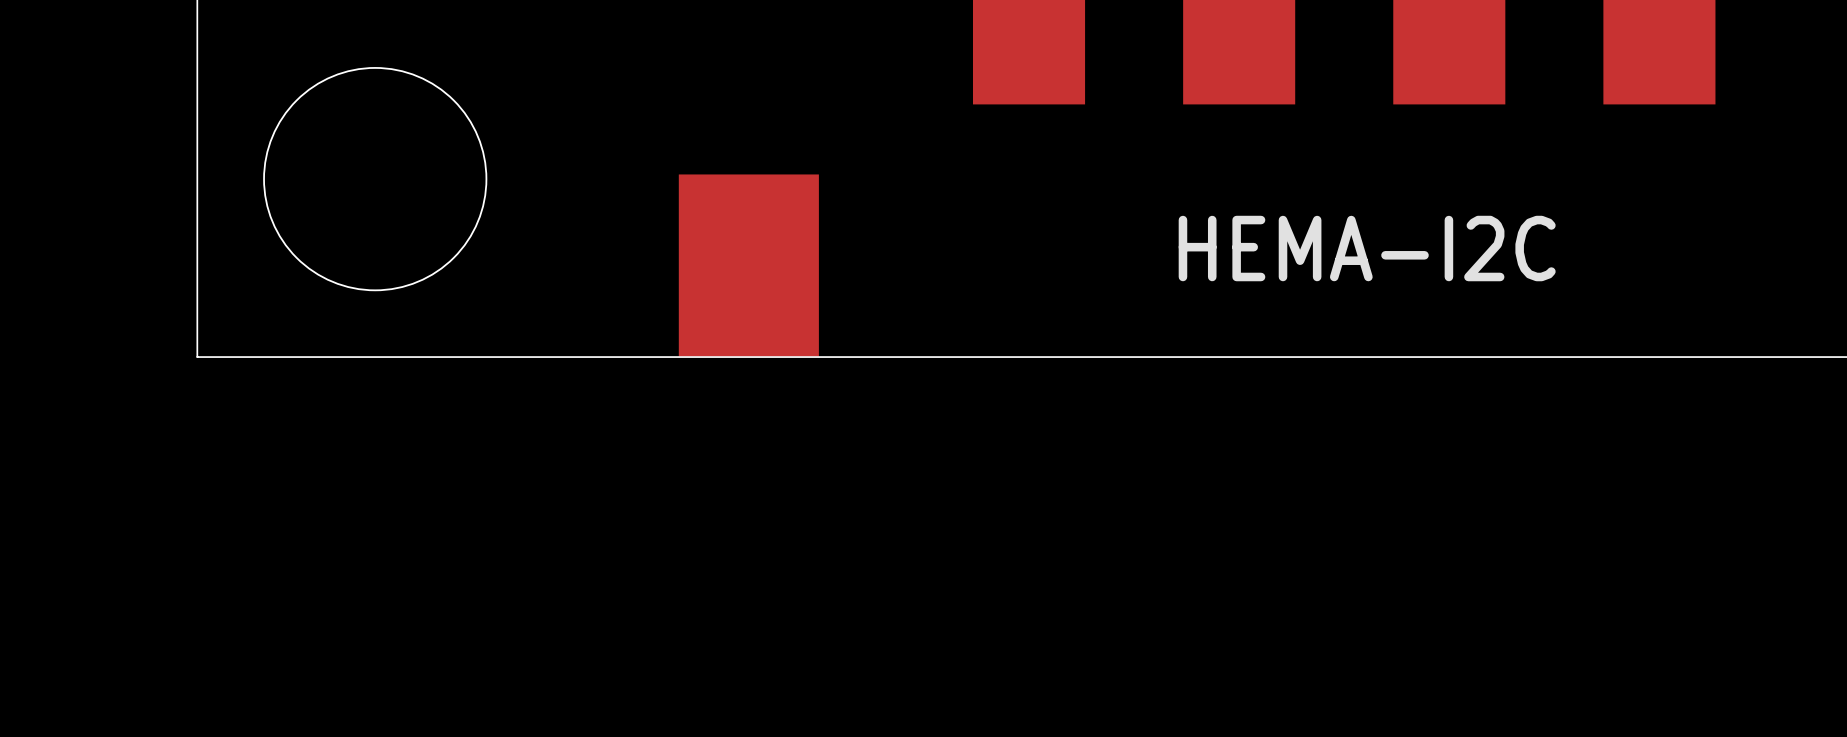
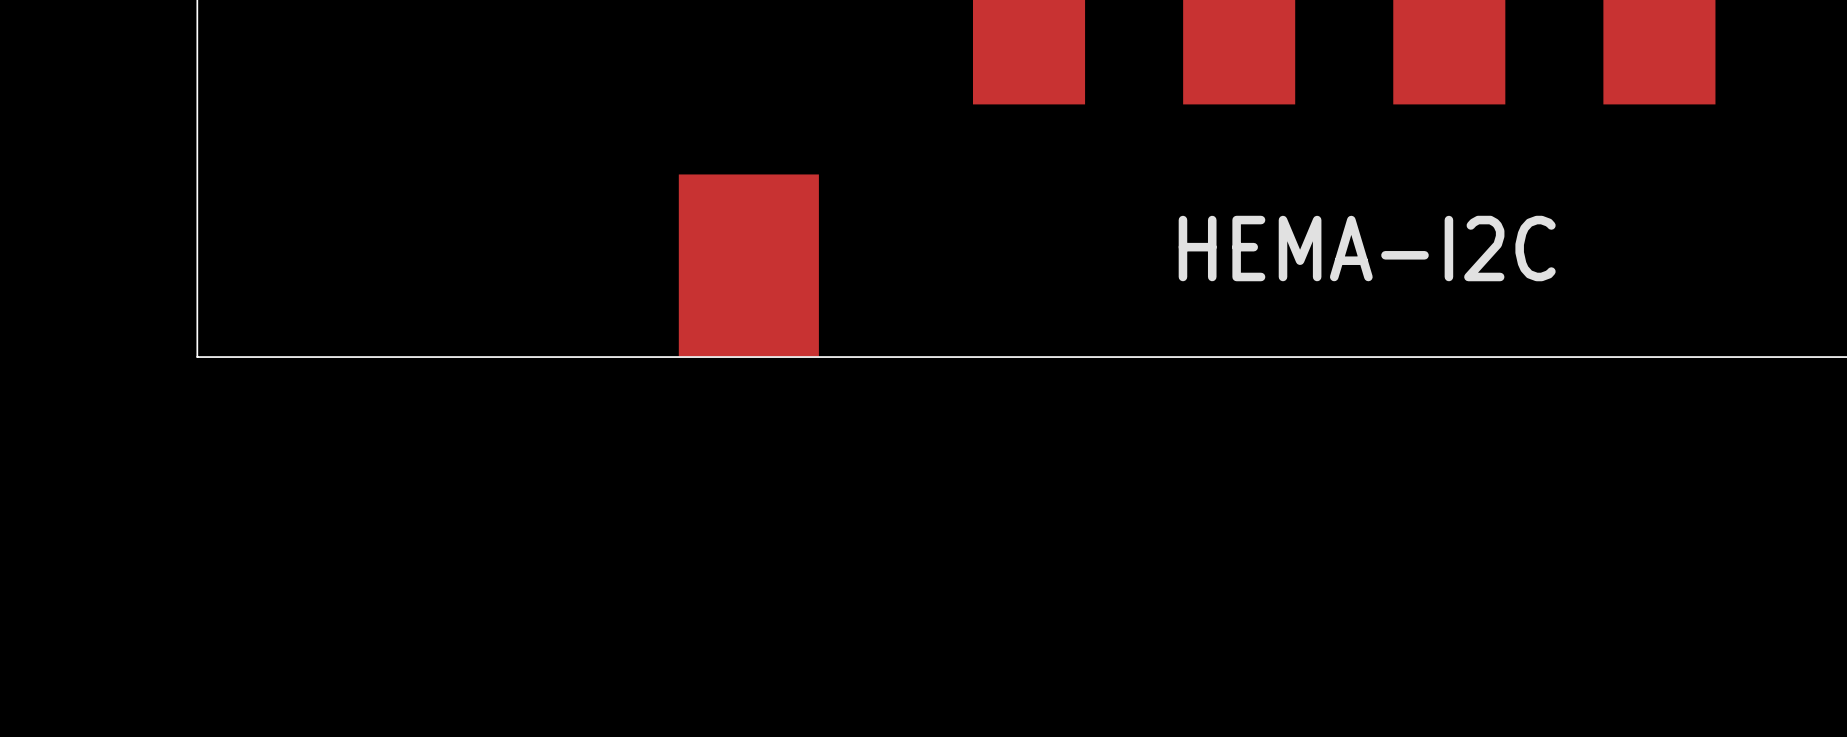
round board edge: [263, 67, 488, 292] -> none

